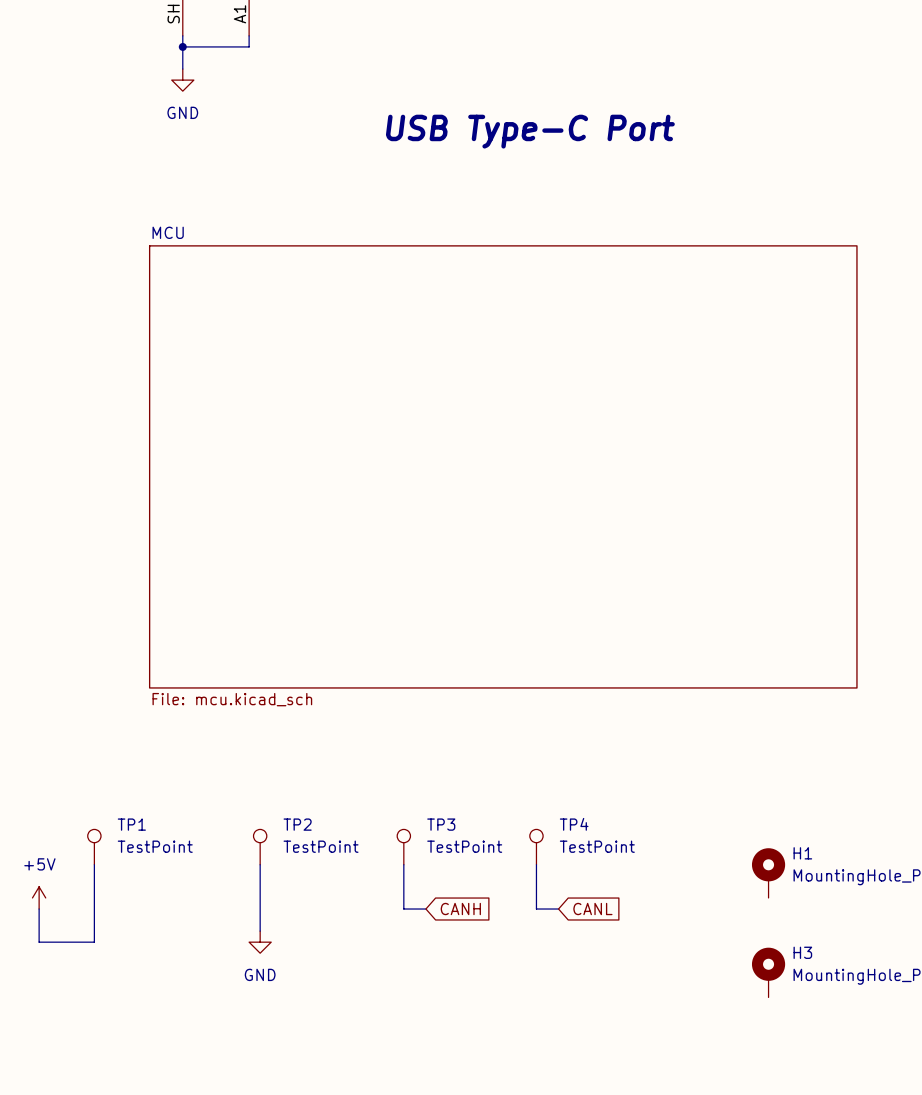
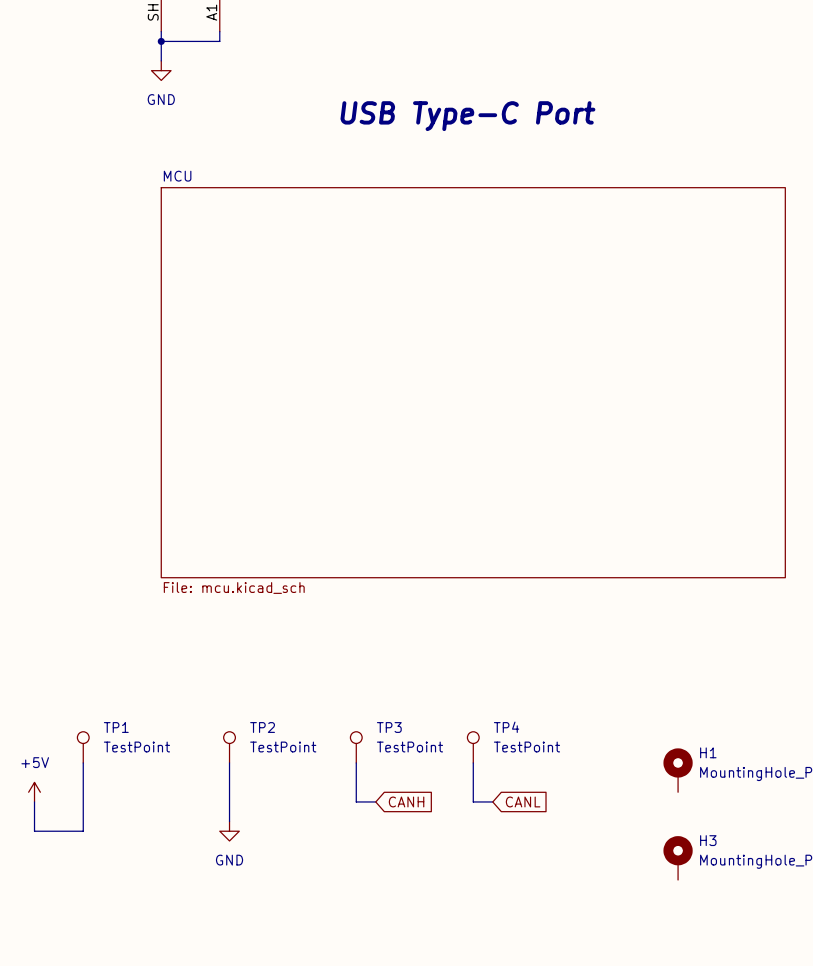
sheet MCU position: (503, 466) -> (473, 382)

